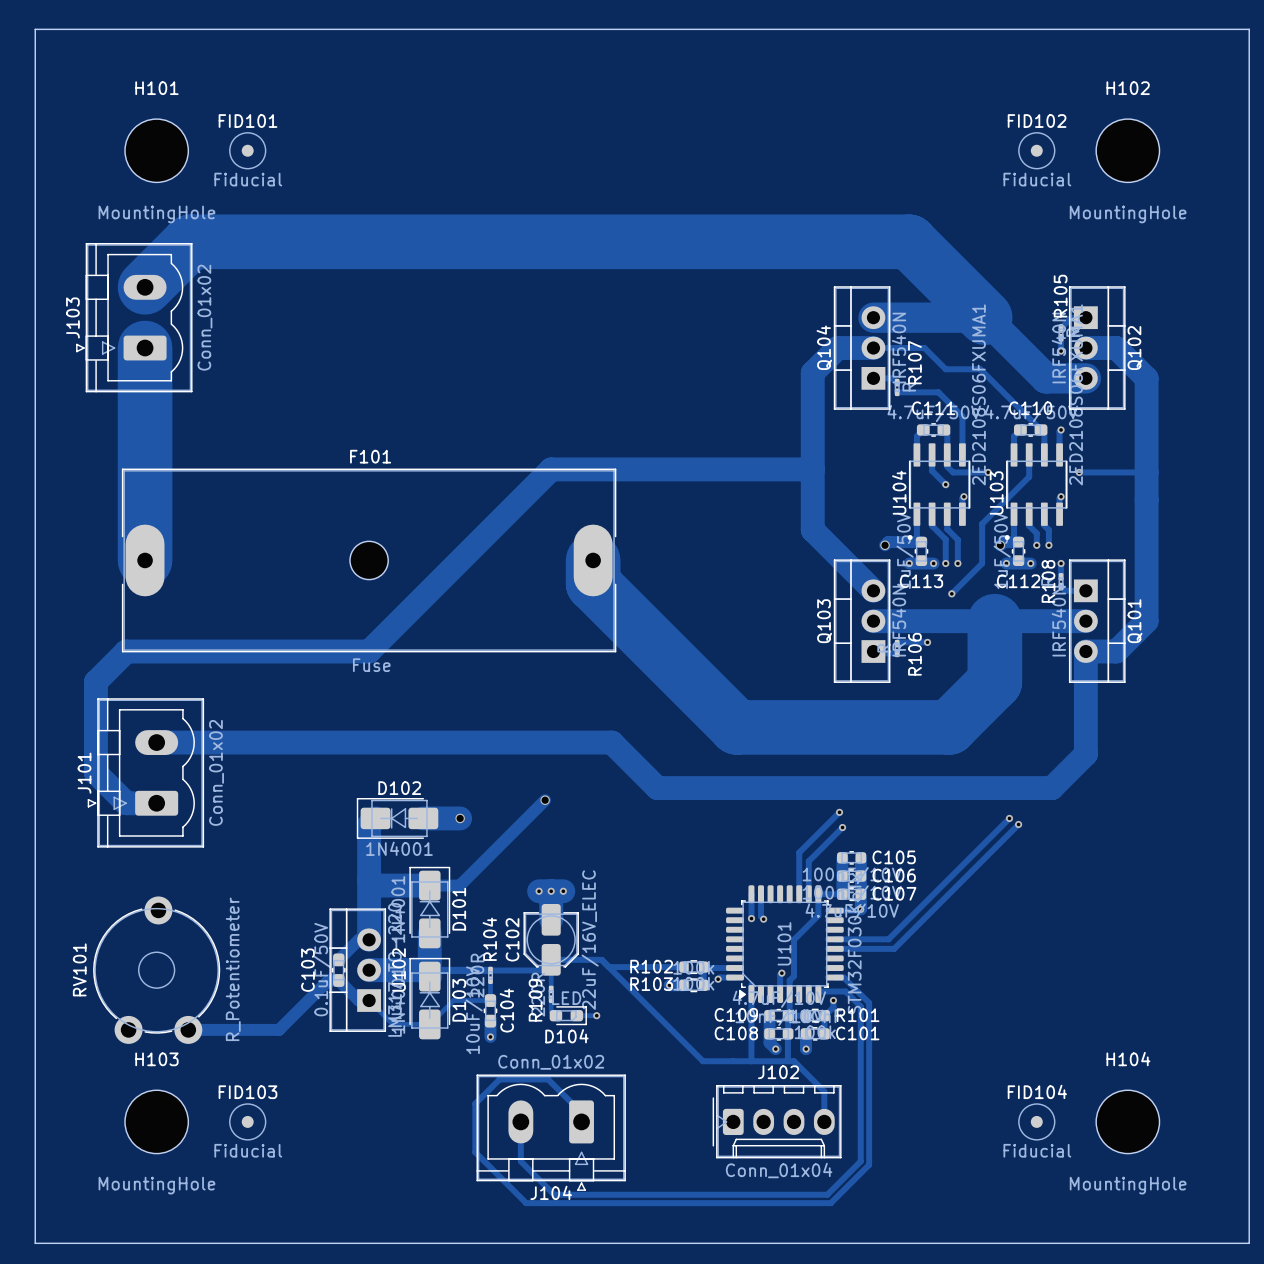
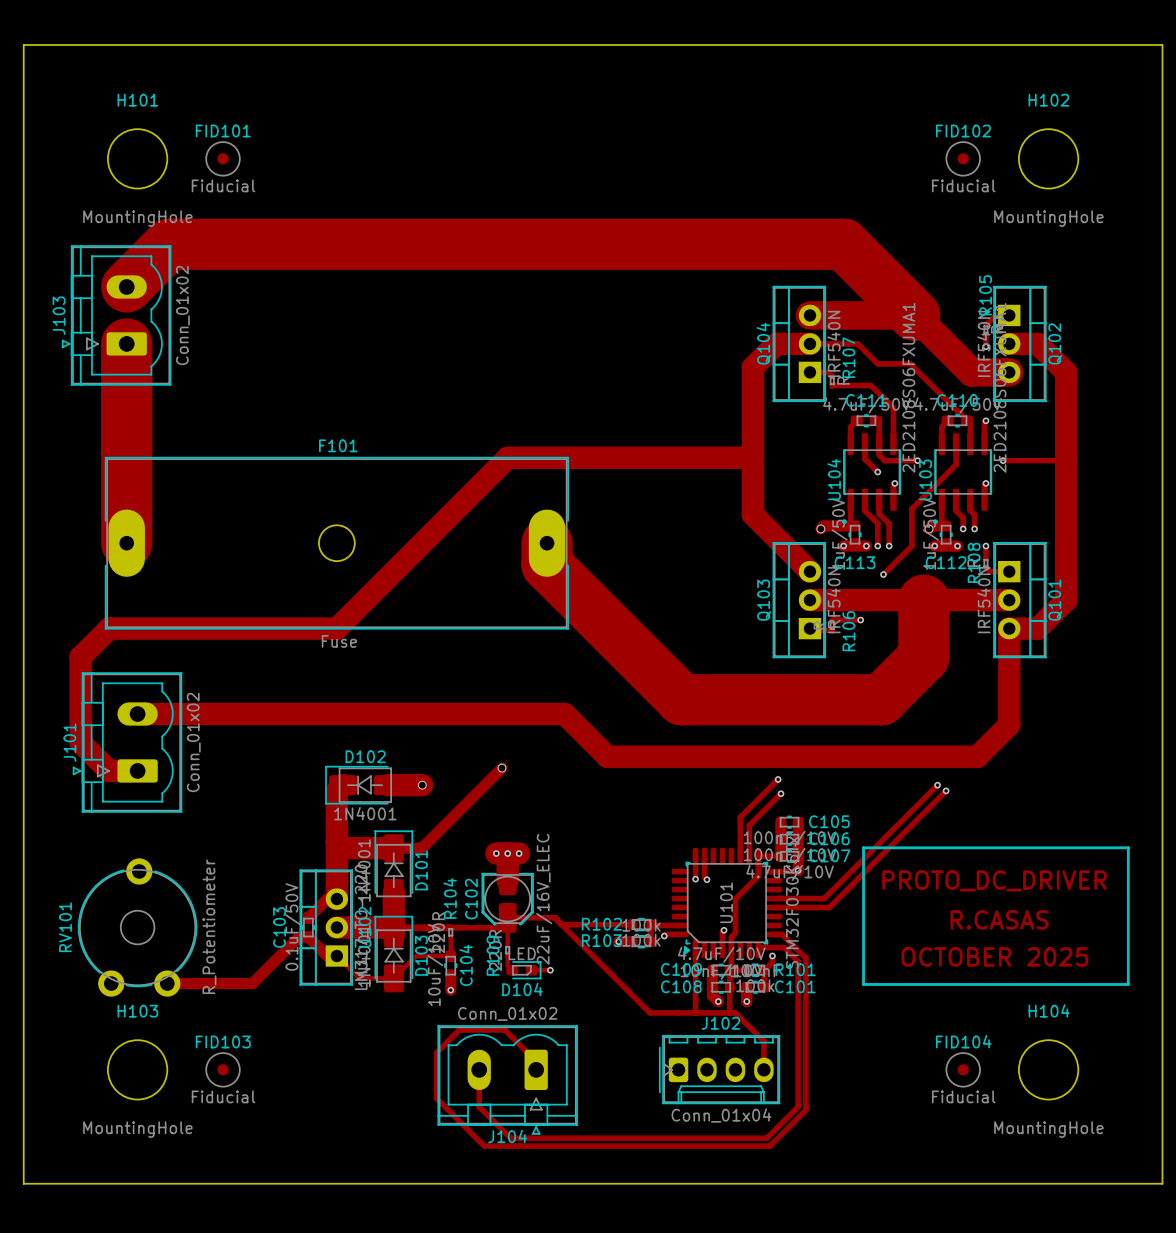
line: none -> (863, 847) (1128, 847) (1128, 984) (863, 984) (863, 847)
text: none -> PROTO_DC_DRIVER (994, 880)
text: none -> R.CASAS (999, 919)
text: none -> OCTOBER 2025 (994, 956)

